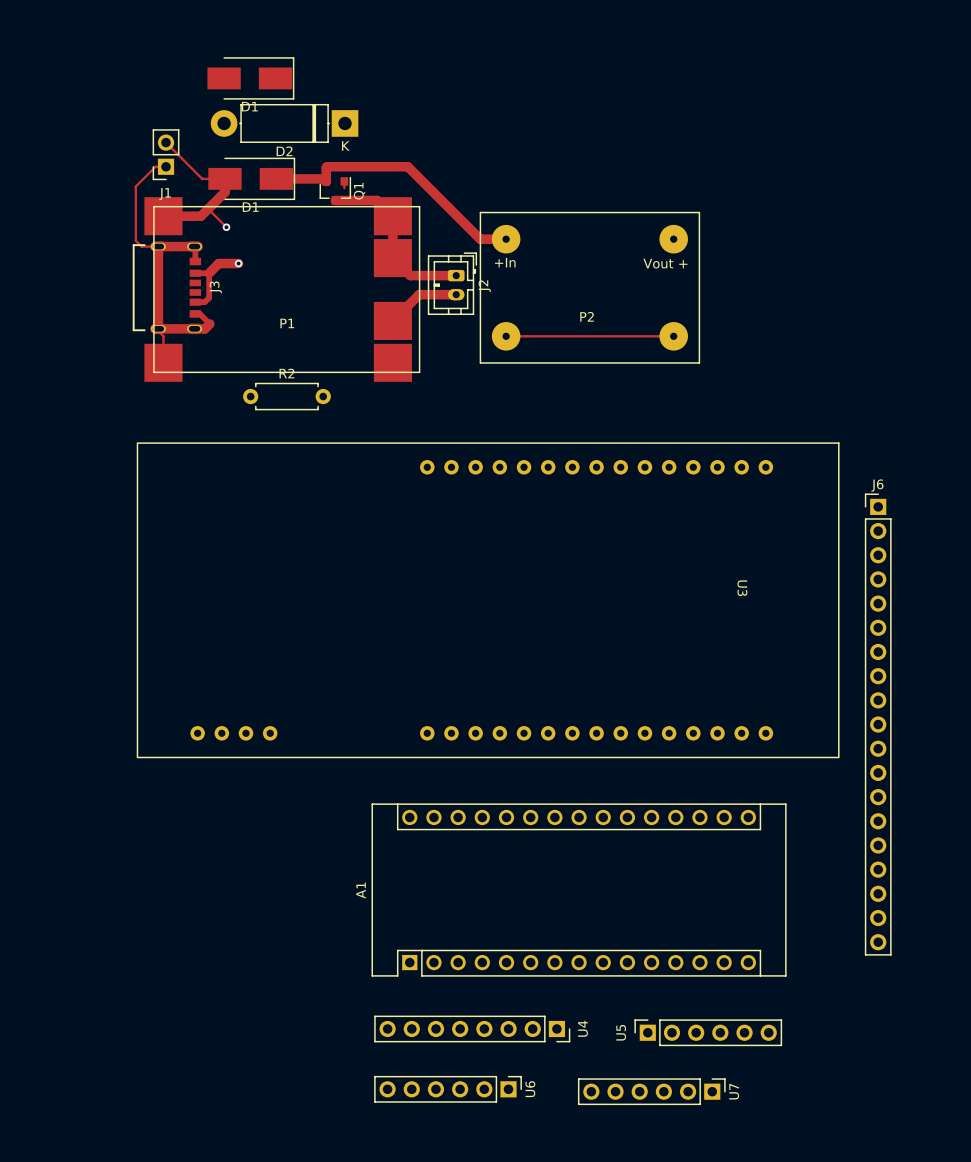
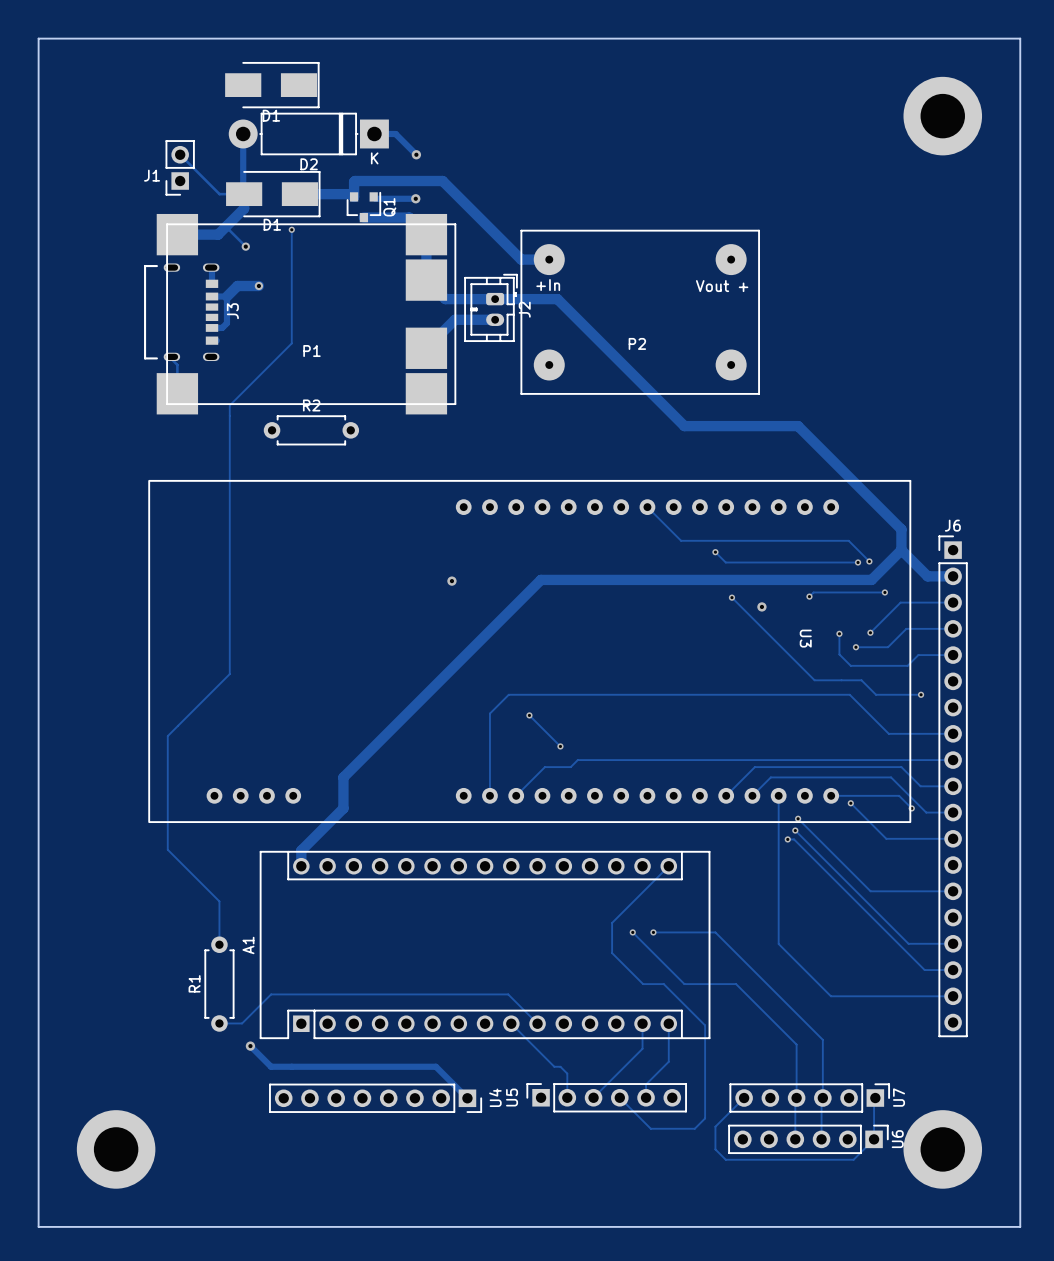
board edge: none -> (38, 38) (1020, 38) (1020, 1226) (38, 1226) (38, 38)
part: none -> (942, 116)
track: none -> (243, 133) (243, 193)
track: none -> (374, 133) (395, 133) (416, 154)
via: none -> (416, 154)
track: (166, 166) (155, 166) (135, 186) (135, 240) (141, 246) (195, 246) -> none
track: (344, 181) (344, 188) -> (373, 196) (375, 198) (415, 198)
via: none -> (415, 198)
J1 name position: J1 (165, 194) -> J1 (152, 175)
track: none -> (291, 229) (291, 343) (229, 405) (229, 674) (167, 736) (167, 849) (219, 901) (219, 944)
via: none -> (291, 229)
J3 footprint: [132, 241, 203, 335] -> [144, 263, 220, 362]
track: (194, 246) (158, 246) (158, 328) (205, 328) (209, 323) (199, 313) -> none
track: none -> (495, 299) (557, 299) (684, 426) (798, 426) (901, 529) (901, 550)
track: (506, 336) (673, 336) -> none
track: none -> (647, 507) (681, 540) (848, 540) (869, 561)
track: none -> (901, 550) (927, 576) (953, 576)
track: none -> (901, 550) (871, 579) (540, 579) (343, 777) (343, 808) (301, 850) (301, 866)
track: none -> (715, 552) (725, 562) (858, 562)
via: none -> (715, 552)
via: none -> (869, 561)
via: none -> (858, 562)
via: none -> (451, 581)
track: none -> (884, 592) (813, 592) (809, 596)
via: none -> (884, 592)
via: none -> (809, 596)
track: none -> (731, 597) (814, 680) (861, 680) (876, 694) (921, 694)
via: none -> (731, 597)
track: none -> (953, 602) (900, 602) (870, 632)
via: none -> (761, 606)
track: none -> (953, 628) (906, 628) (888, 647) (855, 647)
via: none -> (870, 632)
track: none -> (839, 633) (839, 654) (850, 665) (907, 665) (918, 655) (953, 655)
via: none -> (839, 633)
via: none -> (855, 647)
via: none -> (921, 694)
track: none -> (529, 715) (560, 746)
via: none -> (529, 715)
track: none -> (953, 733) (888, 733) (849, 694) (508, 694) (489, 713) (489, 795)
via: none -> (560, 746)
track: none -> (953, 760) (577, 760) (570, 767) (544, 767) (516, 795)
track: none -> (953, 786) (920, 786) (901, 767) (754, 767) (726, 795)
track: none -> (752, 795) (770, 777) (891, 777) (926, 812) (953, 812)
track: none -> (778, 795) (778, 944) (830, 996) (953, 996)
track: none -> (831, 795) (899, 795) (911, 808)
track: none -> (850, 803) (886, 838) (953, 838)
via: none -> (850, 803)
via: none -> (911, 808)
track: none -> (798, 818) (870, 891) (953, 891)
via: none -> (798, 818)
track: none -> (795, 830) (908, 943) (953, 943)
via: none -> (795, 830)
track: none -> (787, 839) (794, 839) (924, 970) (953, 970)
via: none -> (787, 839)
track: none -> (668, 866) (612, 922) (612, 953) (643, 984) (663, 984) (705, 1025) (705, 1118) (694, 1128) (650, 1128) (619, 1097)
track: none -> (632, 932) (684, 984) (736, 984) (796, 1044) (795, 1139)
via: none -> (632, 932)
track: none -> (653, 932) (715, 932) (822, 1039) (821, 1139)
via: none -> (653, 932)
A1 position: (579, 890) -> (485, 944)
R1: none -> (219, 984)
track: none -> (219, 1023) (242, 1023) (271, 994) (508, 994) (537, 1023)
track: none -> (511, 1023) (554, 1066) (560, 1066) (567, 1073) (567, 1097)
track: none -> (642, 1023) (642, 1048) (593, 1097)
track: none -> (668, 1023) (668, 1061) (646, 1084) (646, 1097)
track: none -> (250, 1046) (271, 1066) (435, 1066) (467, 1098)
via: none -> (250, 1046)
track: none -> (744, 1098) (715, 1126) (715, 1149) (725, 1159) (853, 1159) (874, 1139) (875, 1098)
U4 position: (472, 1028) -> (375, 1098)
U5 position: (708, 1032) -> (606, 1097)
part: none -> (116, 1149)
part: none -> (942, 1149)
U6 position: (448, 1089) -> (808, 1139)
U7 position: (651, 1091) -> (809, 1098)

